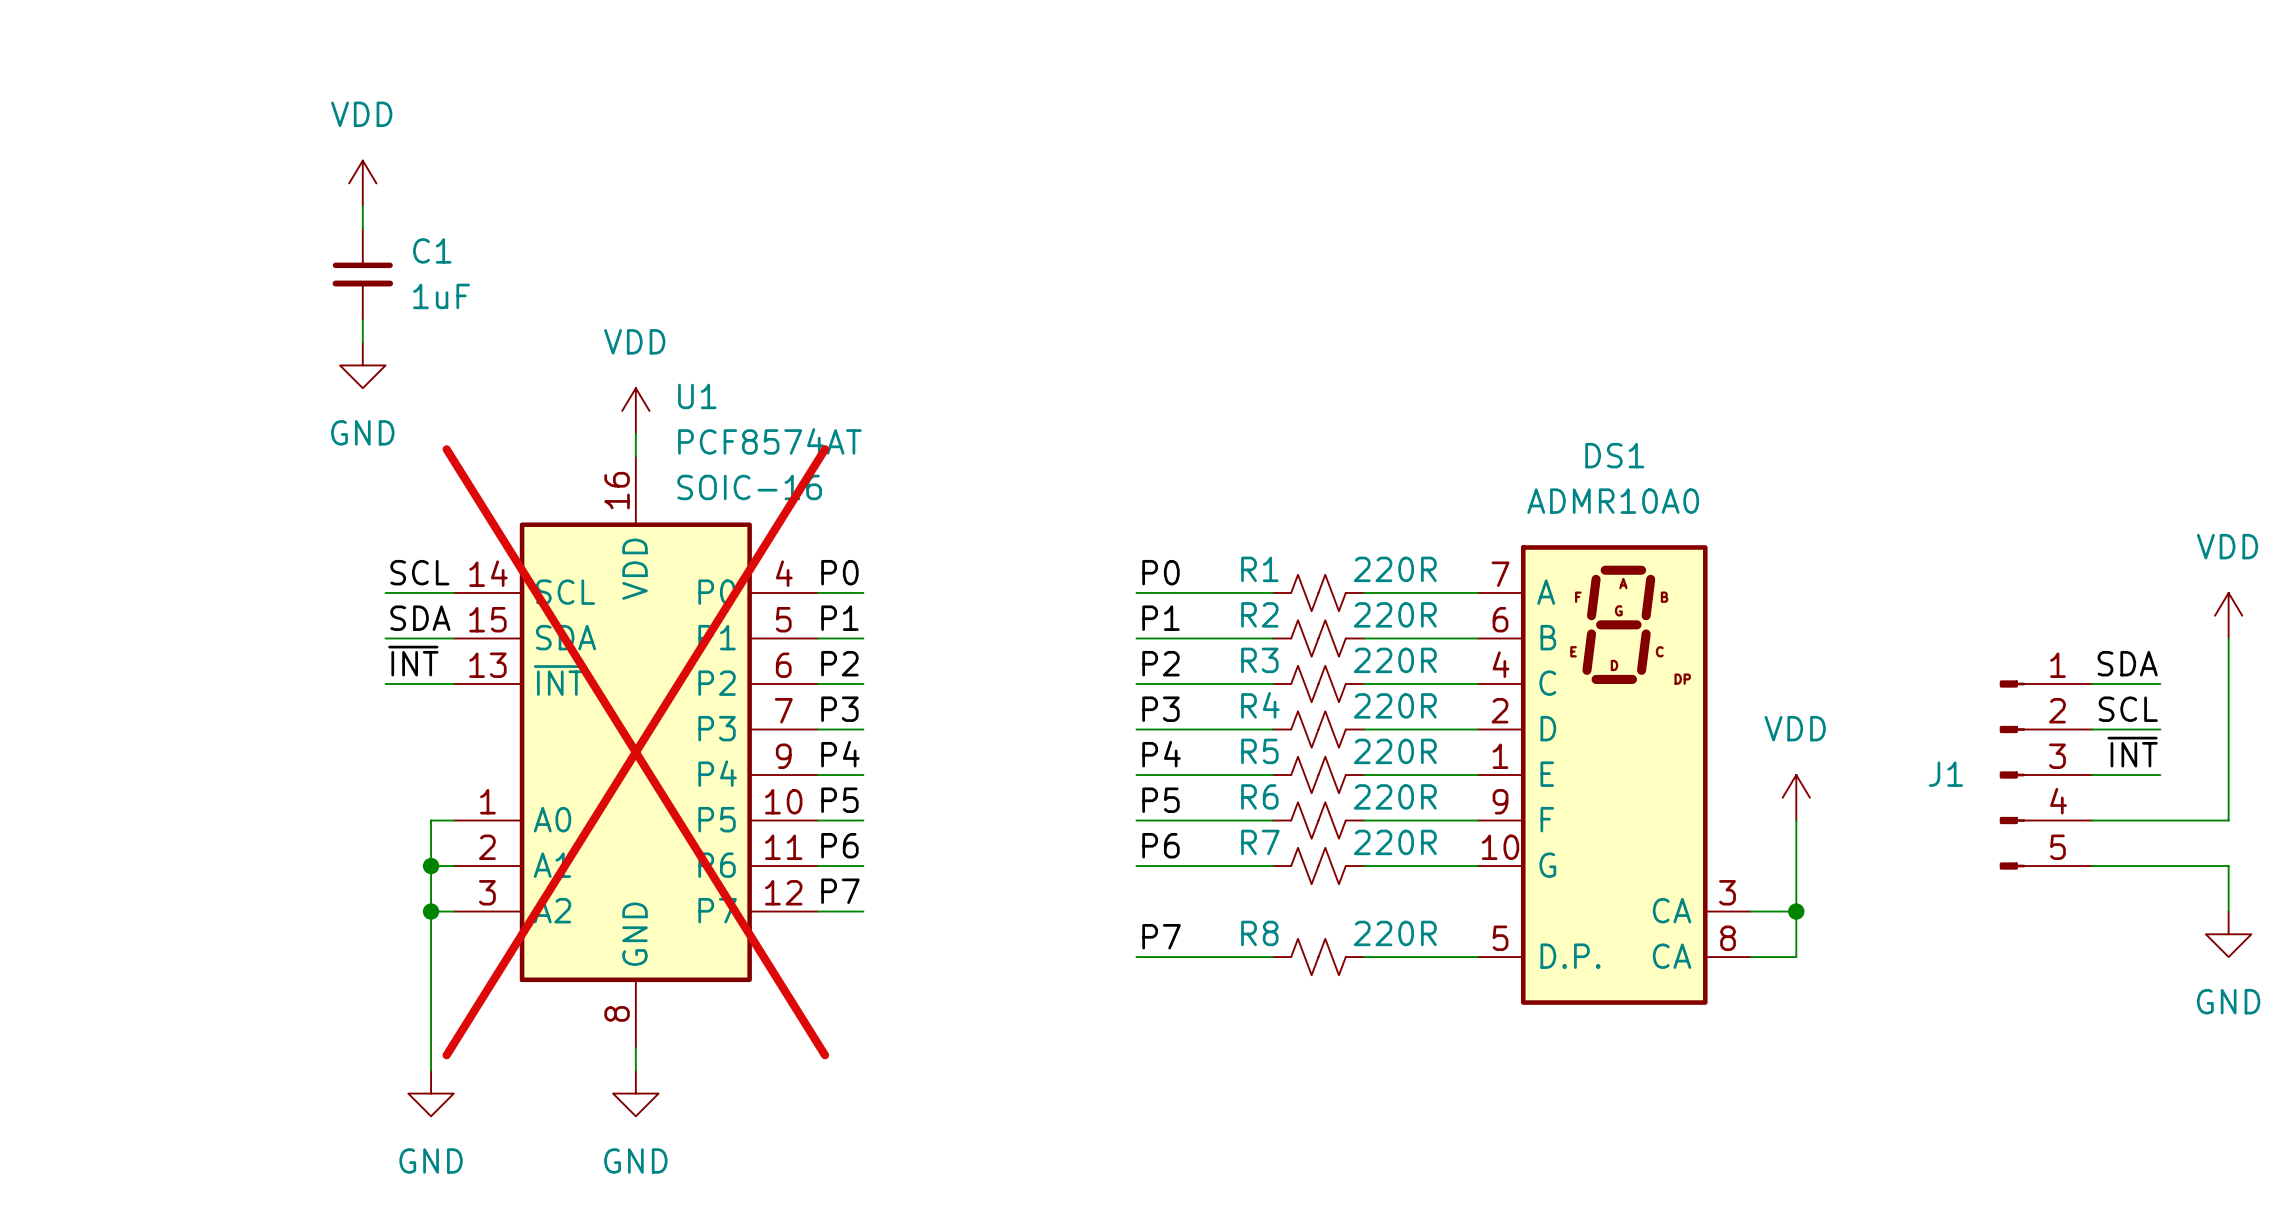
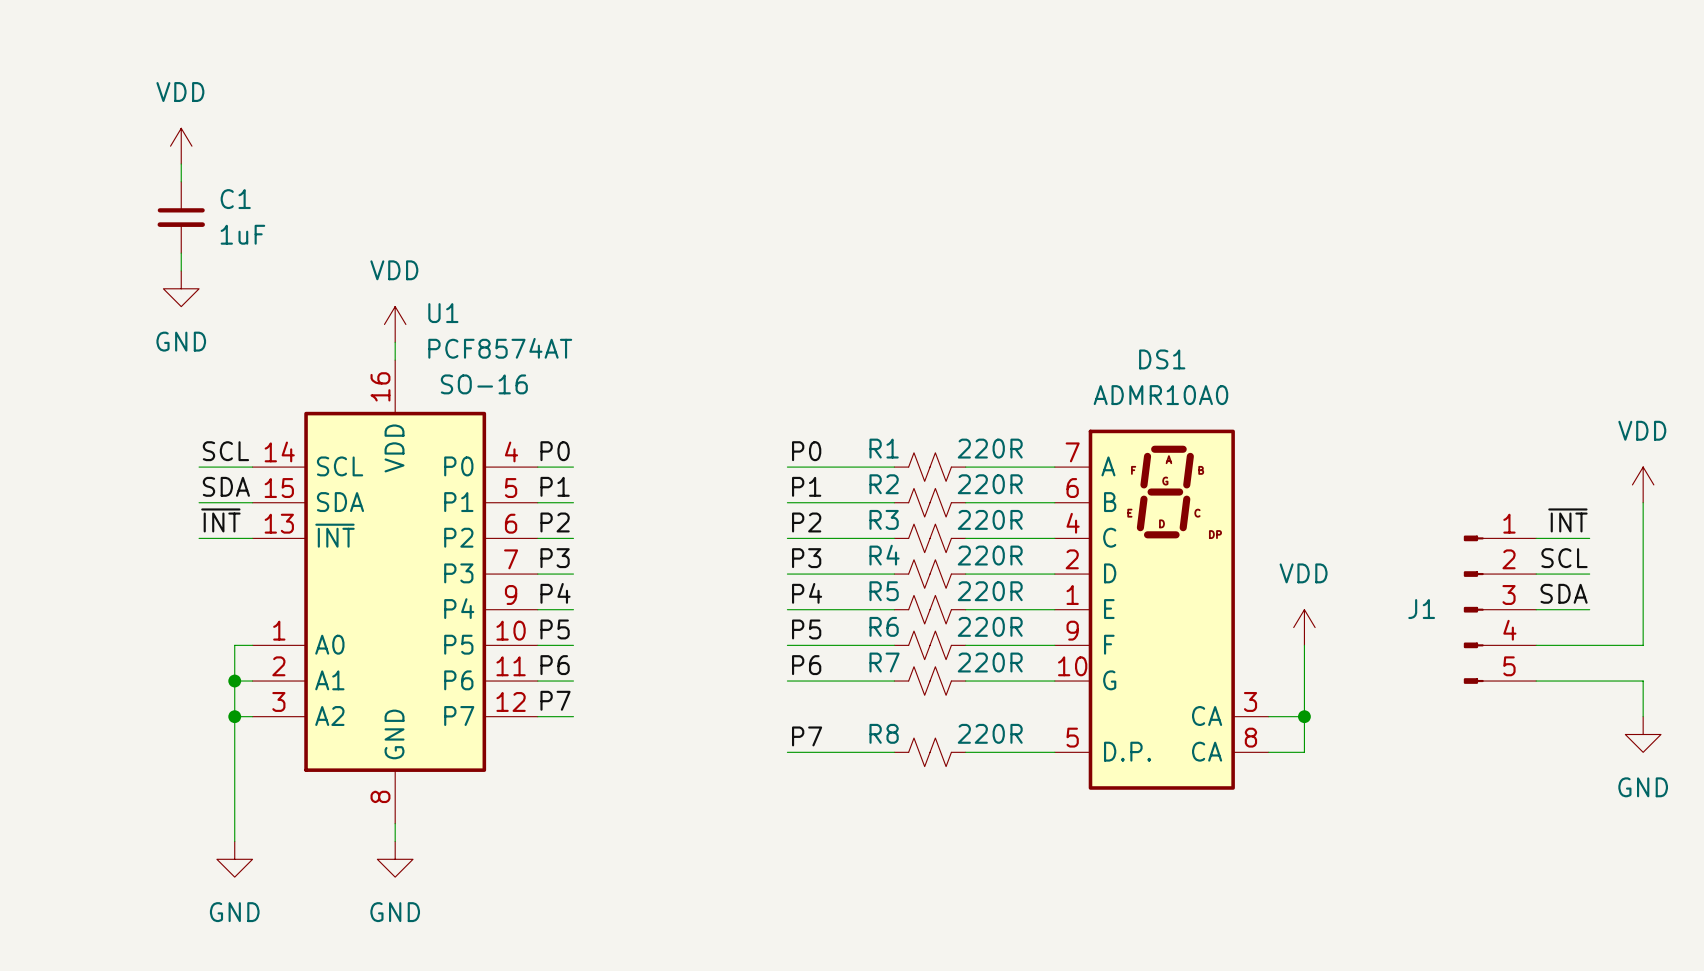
U1 text: SOIC-16 (749, 487) -> SO-16 (484, 384)
label: SDA (2127, 663) -> ~{INT} (1567, 520)
U1 do-not-place cross: (635, 752) -> none
label: ~{INT} (2132, 752) -> SDA (1564, 593)

